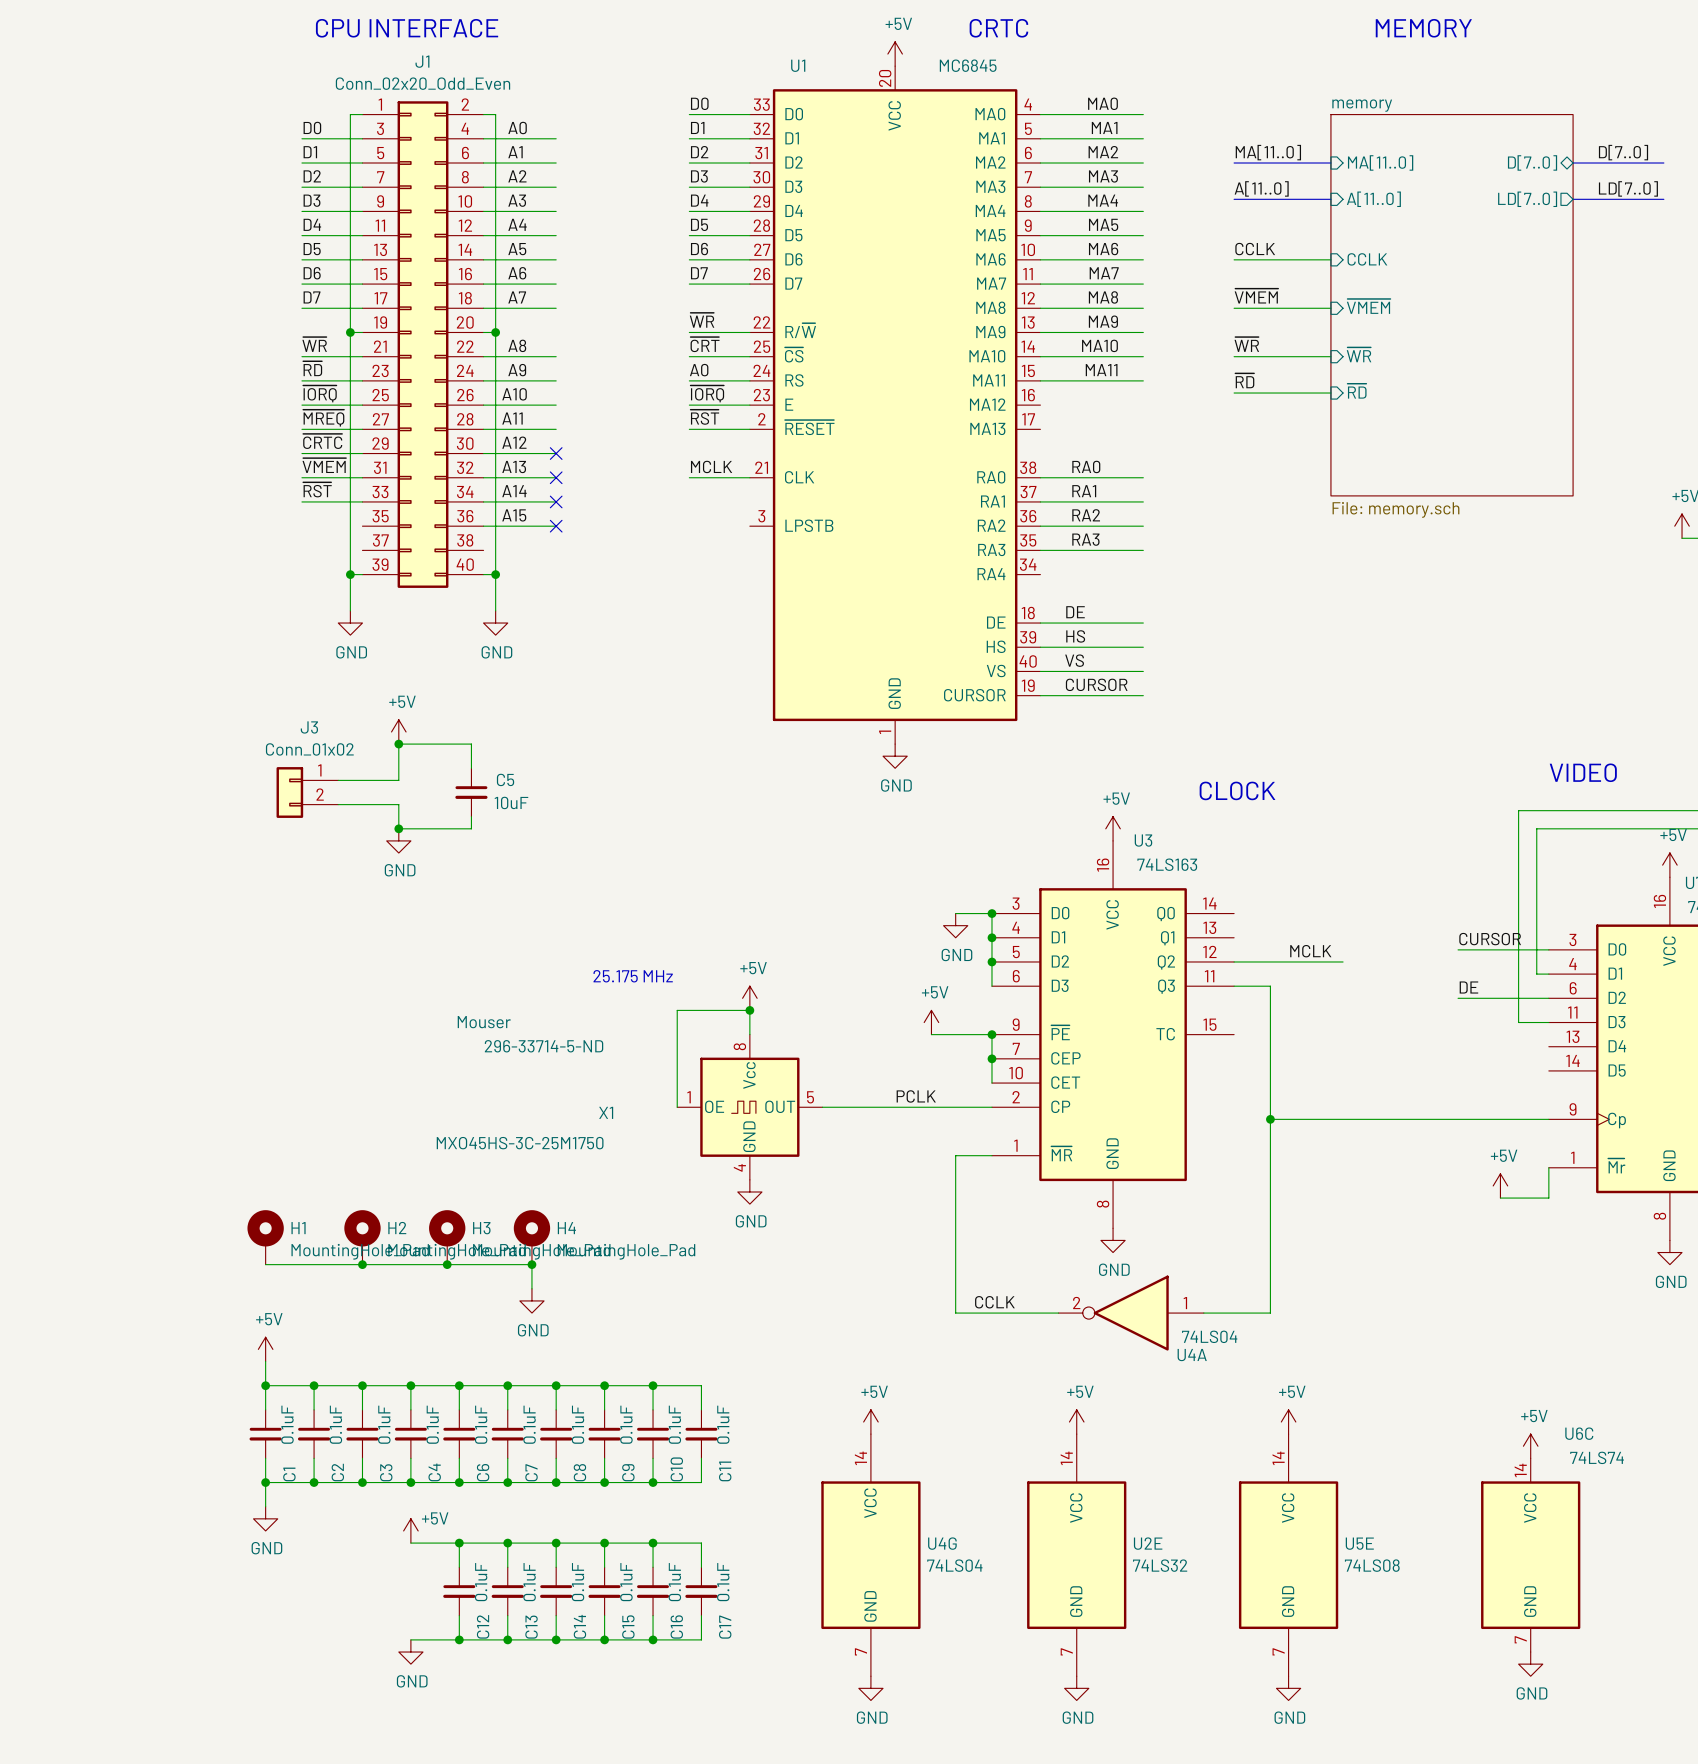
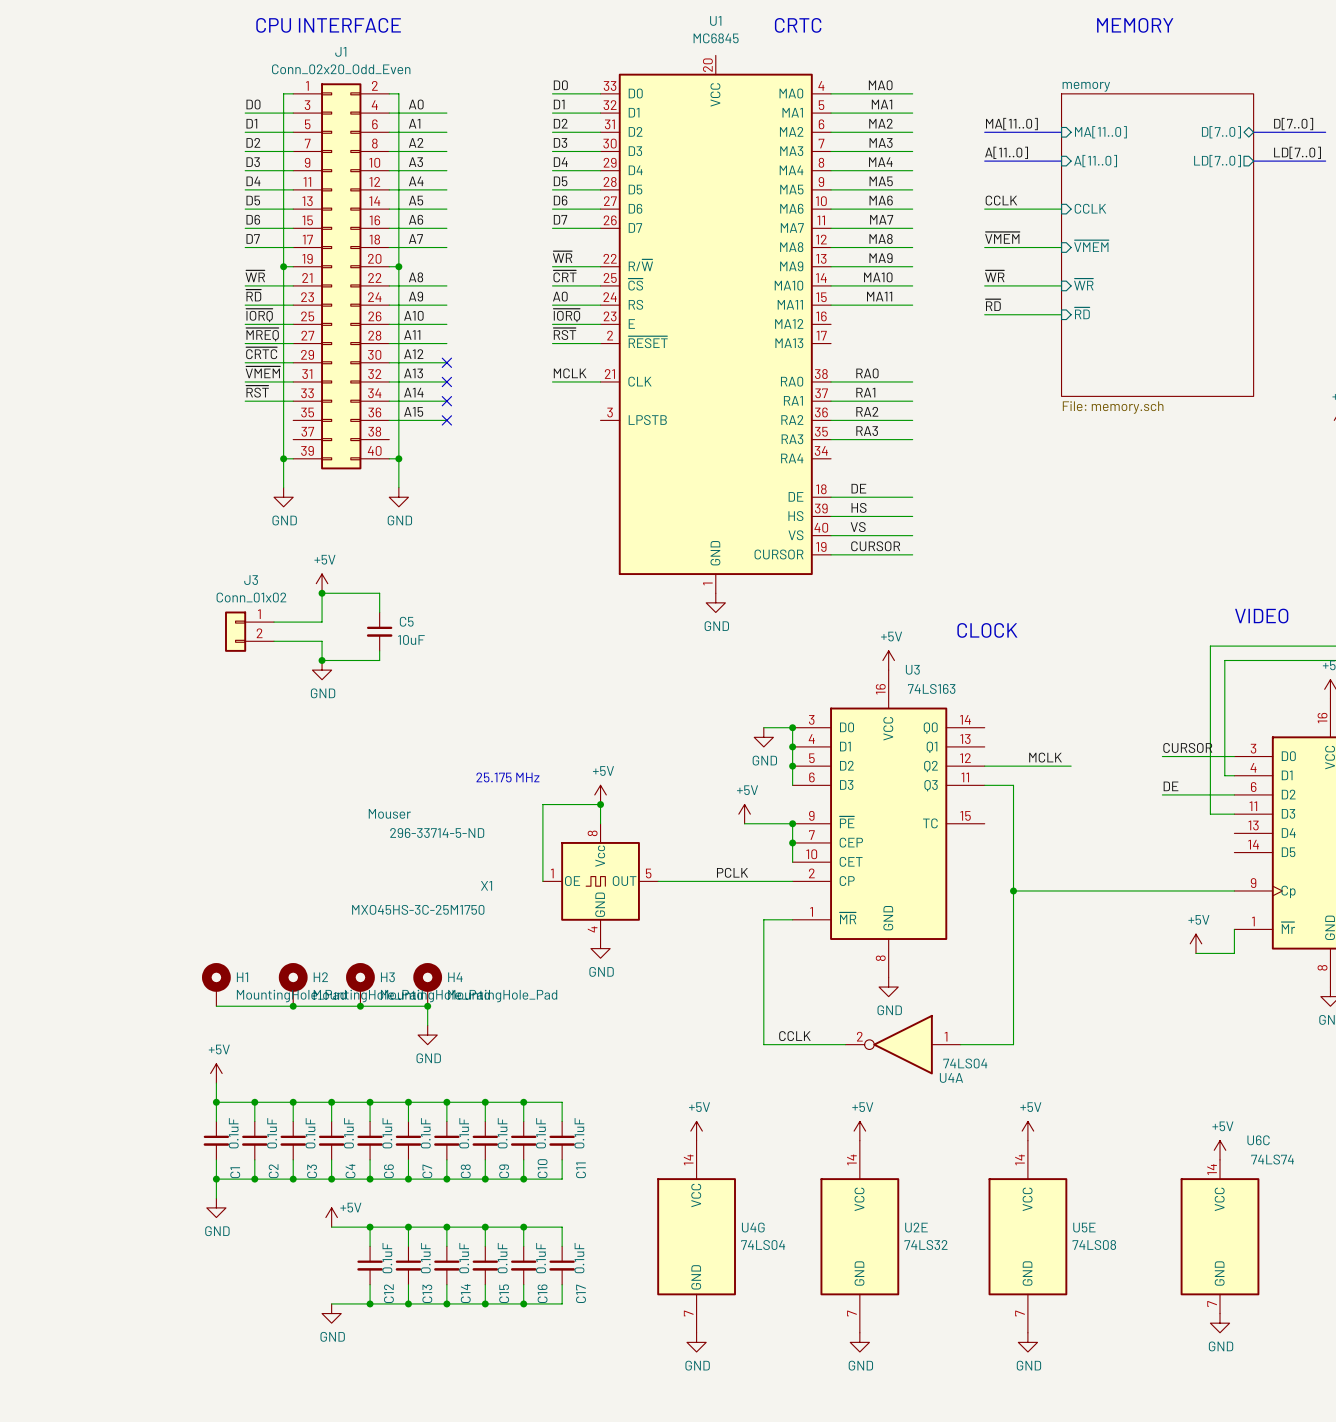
power symbol: +5V (895, 54) -> none
U1 name position: U1 (798, 65) -> U1 (715, 20)
U1 value position: MC6845 (968, 65) -> MC6845 (716, 38)

